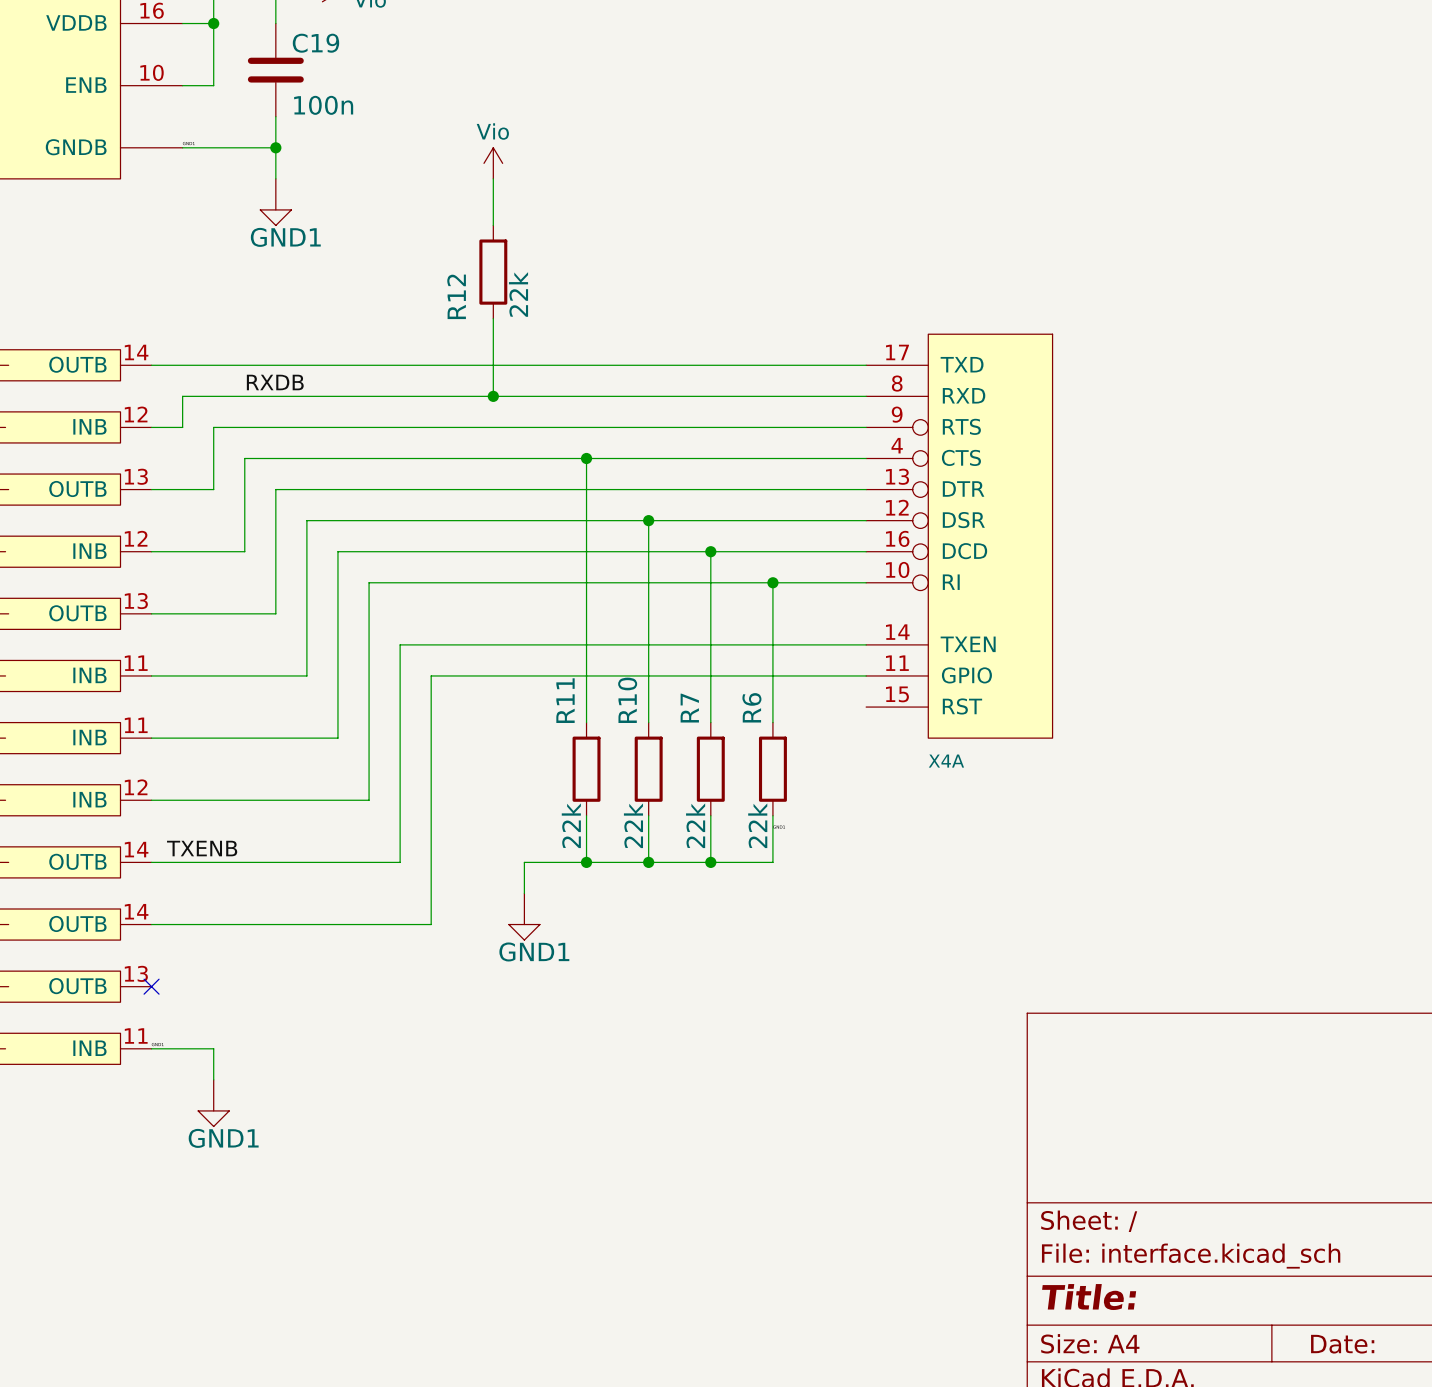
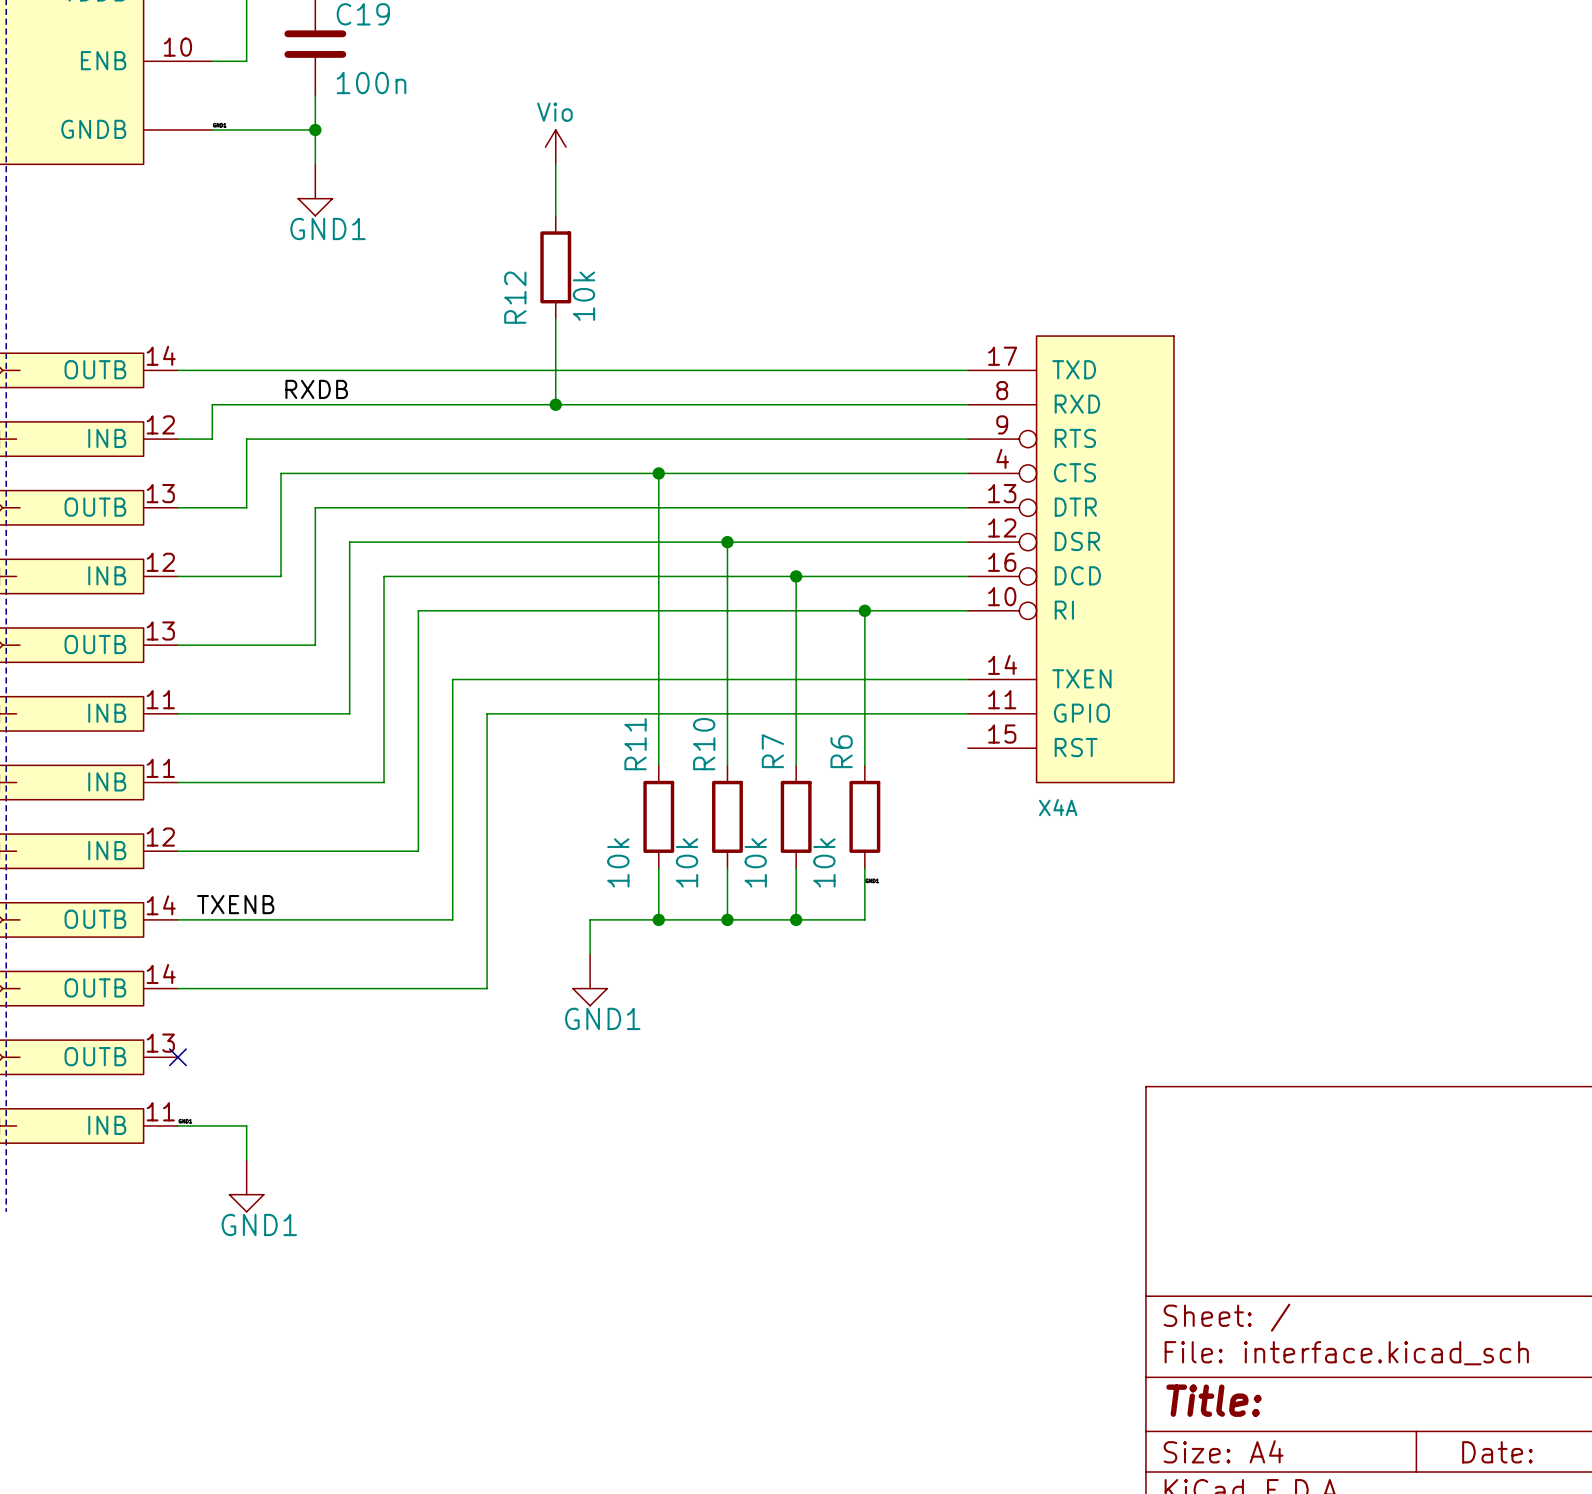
R12 value: 22k (518, 294) -> 10k (584, 296)
R11 value: 22k (571, 825) -> 10k (618, 862)
R10 value: 22k (633, 825) -> 10k (687, 862)
R7 value: 22k (695, 825) -> 10k (755, 862)
R6 value: 22k (757, 825) -> 10k (824, 862)

